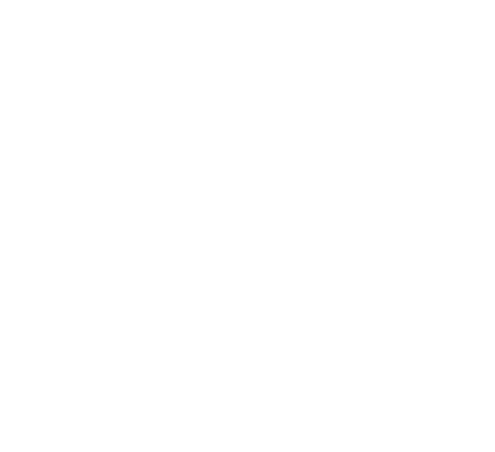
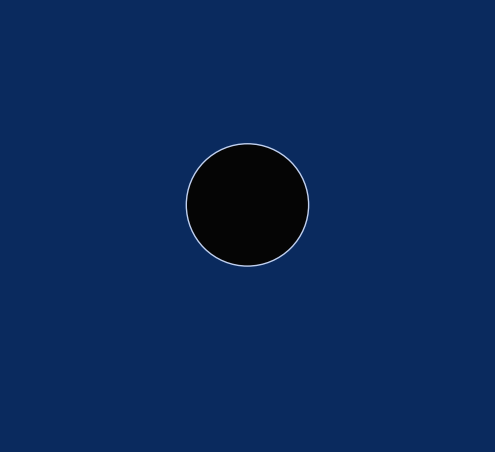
part: none -> (247, 204)

